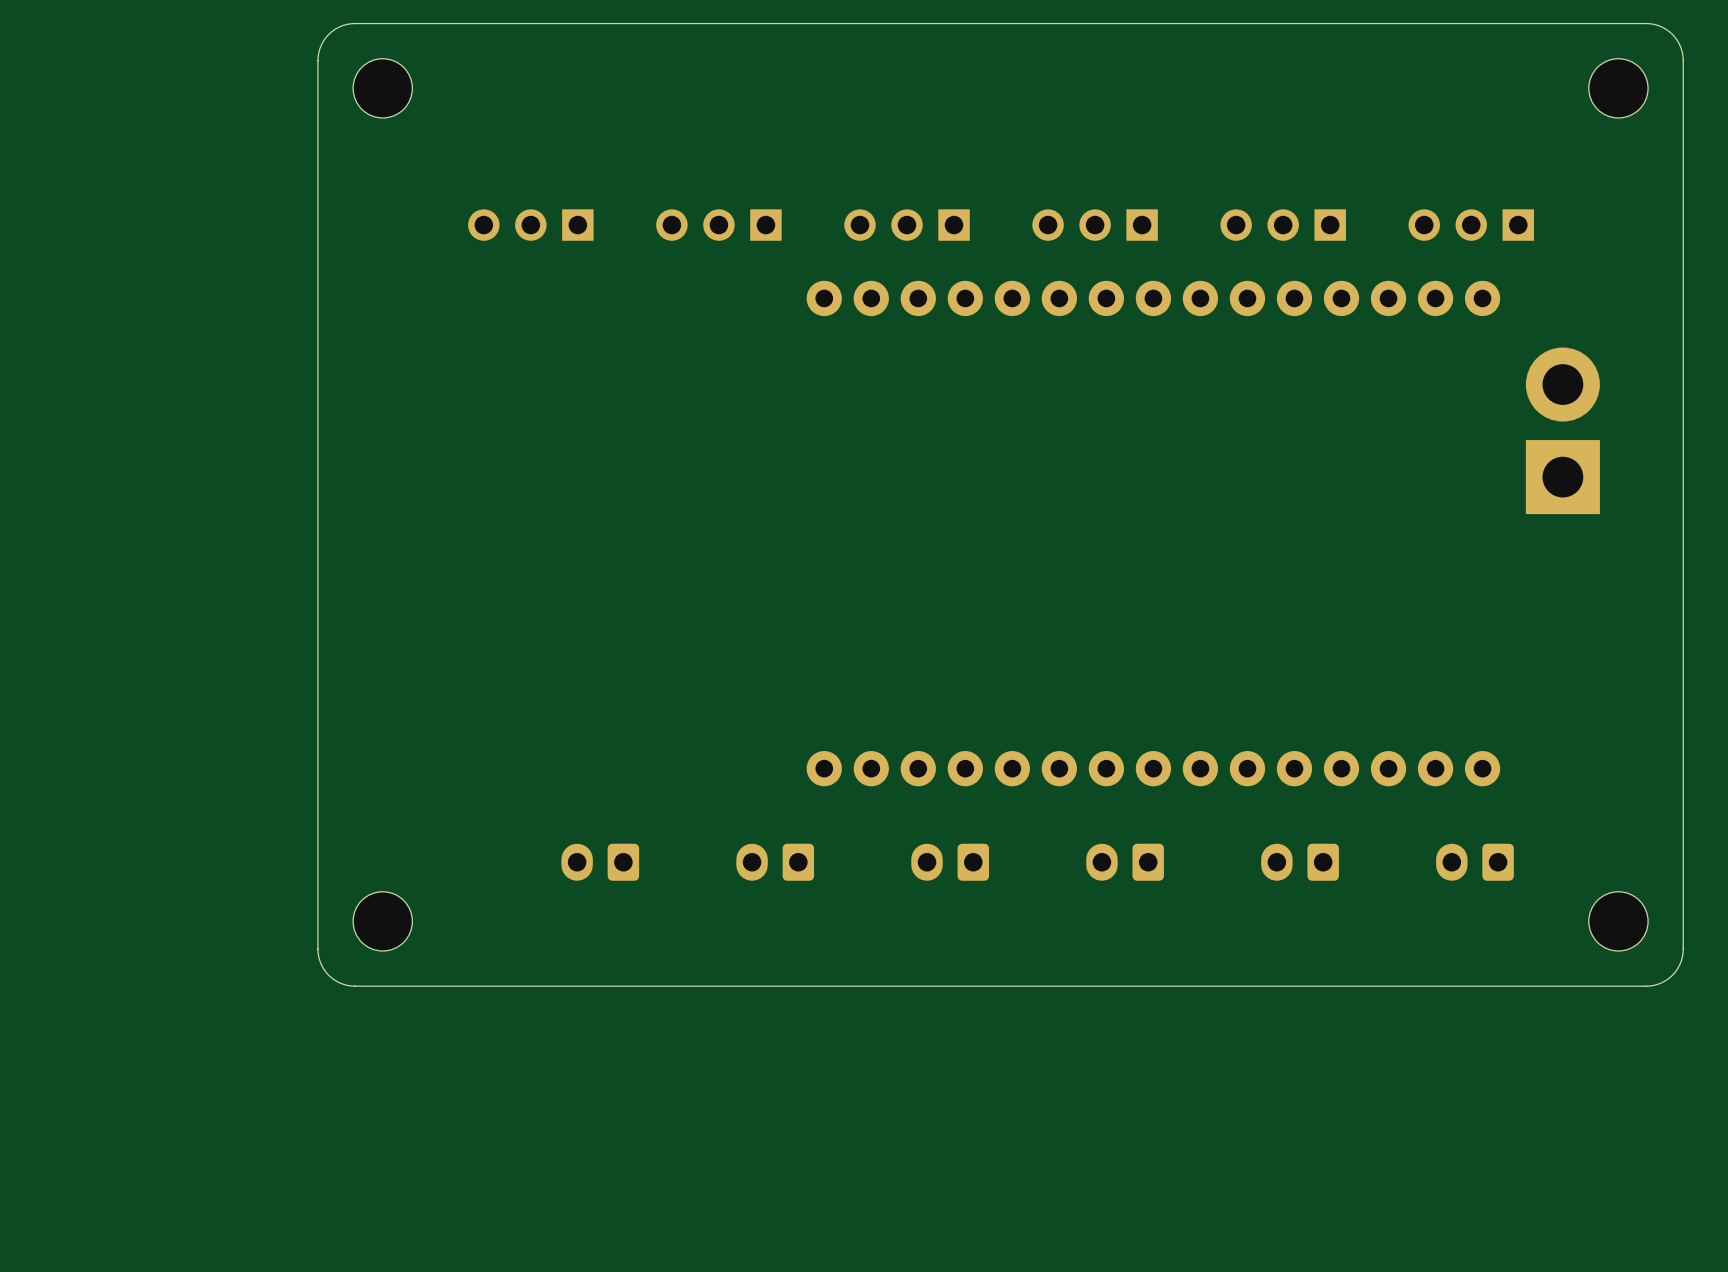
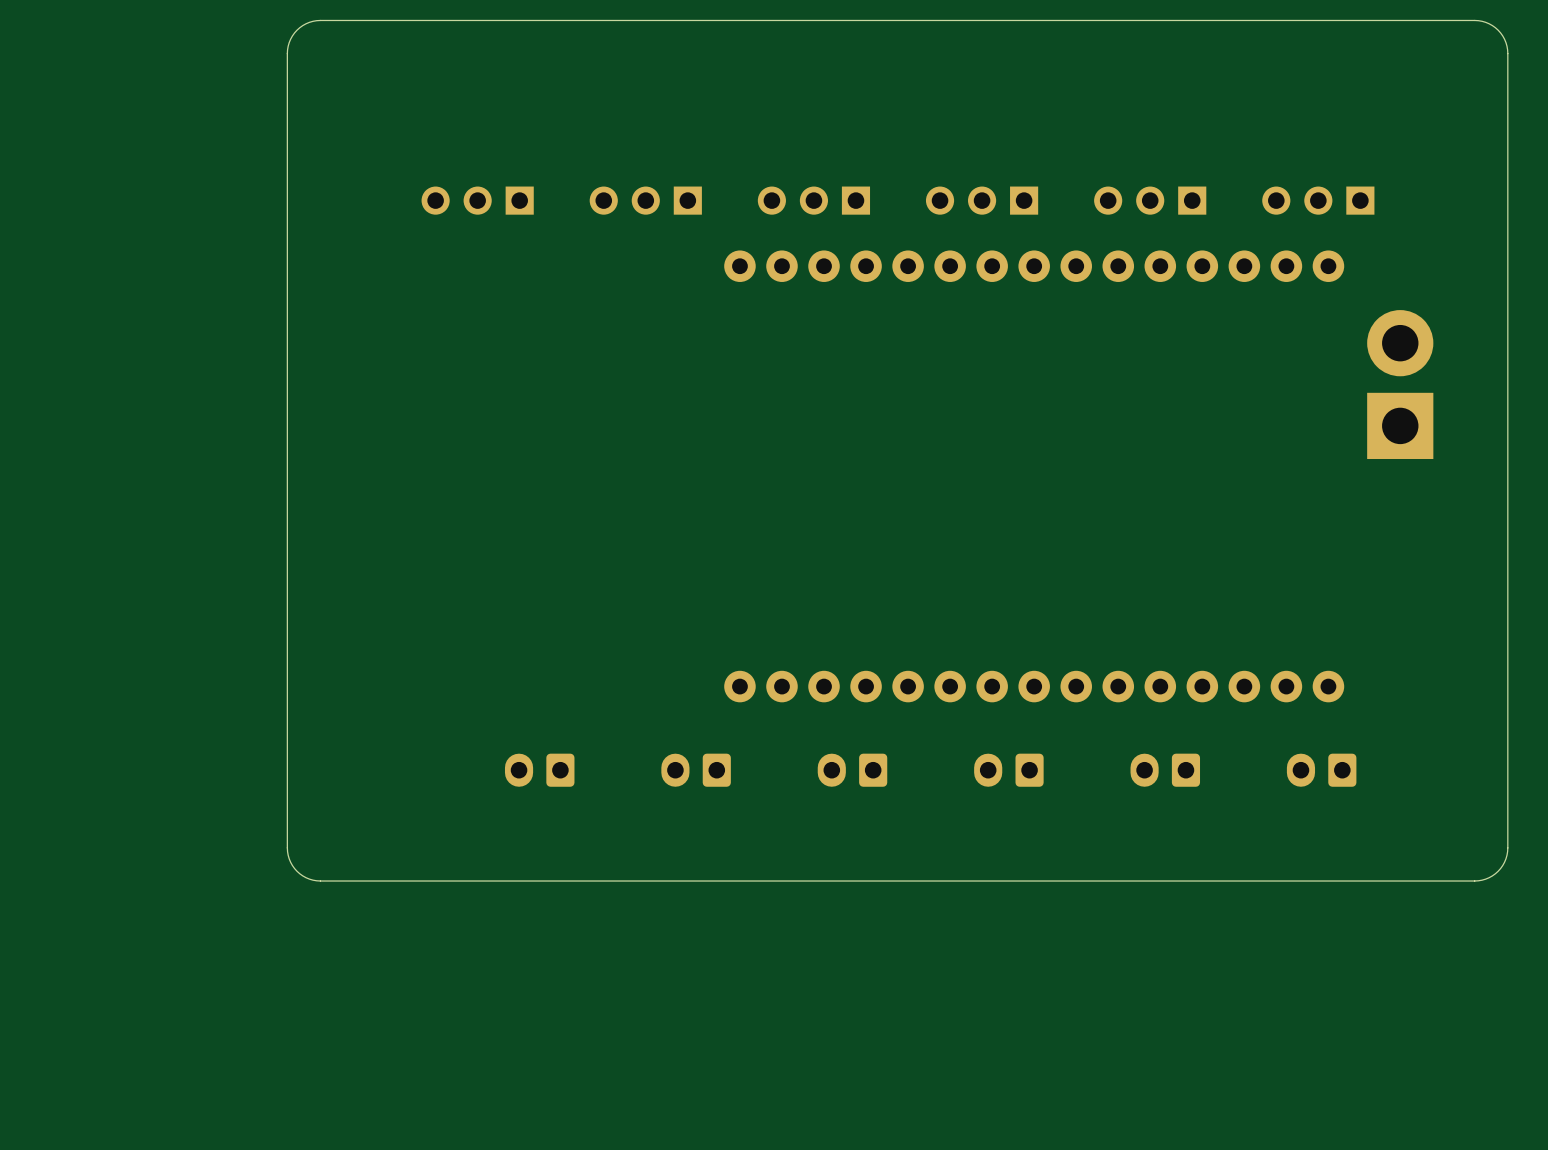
part: (382, 88) -> none
part: (1618, 88) -> none
part: (382, 921) -> none
part: (1618, 921) -> none

